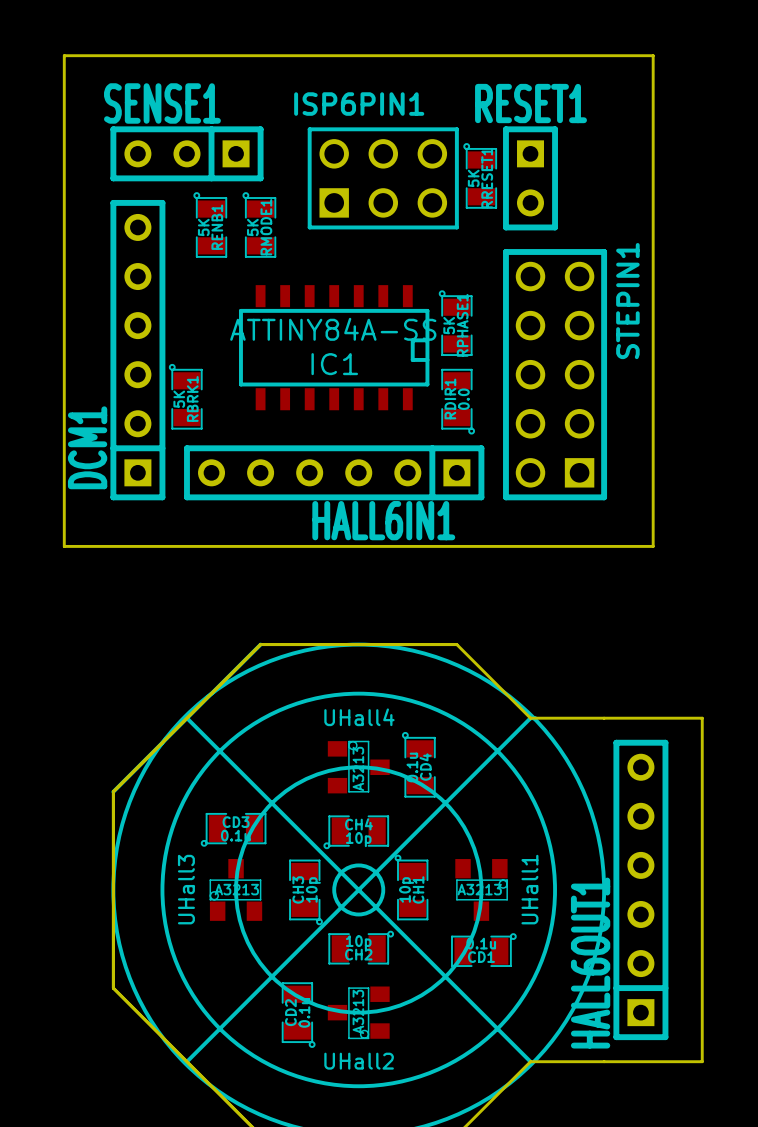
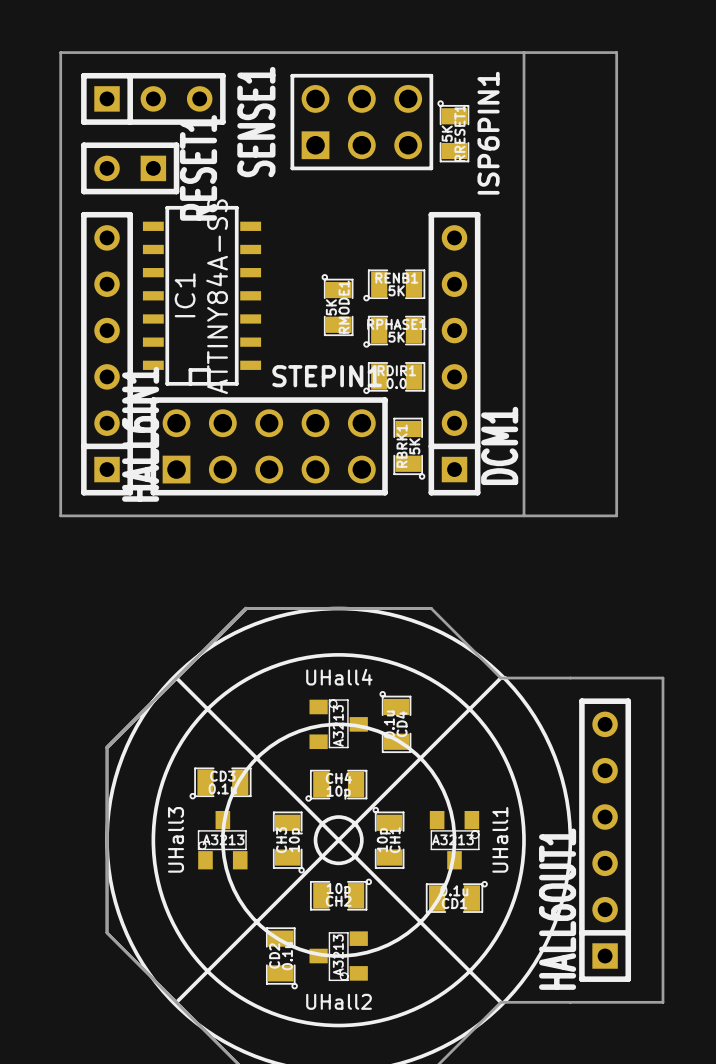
board edge: none -> (524, 52) (524, 515)
SENSE1 name position: SENSE1 (162, 103) -> SENSE1 (256, 122)
ISP6PIN1 name rotation: 0° (359, 104) -> 90° counterclockwise (488, 133)
ISP6PIN1 name position: ISP6PIN1 (359, 104) -> ISP6PIN1 (488, 133)
SENSE1 rotation: 0° (186, 153) -> 180° (153, 98)
RRESET1 position: (480, 175) -> (453, 131)
ISP6PIN1 position: (383, 178) -> (361, 122)
RESET1 rotation: 0° (530, 178) -> 90° clockwise (130, 168)
RESET1 position: (530, 178) -> (130, 168)
RENB1 rotation: 0° (210, 225) -> 90° counterclockwise (394, 285)
RENB1 position: (210, 225) -> (394, 285)
RMODE1 position: (259, 225) -> (337, 305)
RPHASE1 rotation: 0° (455, 323) -> 90° counterclockwise (394, 331)
RPHASE1 position: (455, 323) -> (394, 331)
IC1 rotation: 0° (334, 347) -> 90° clockwise (202, 295)
IC1 position: (334, 347) -> (202, 295)
DCM1 position: (137, 350) -> (454, 353)
STEPIN1 rotation: 0° (555, 374) -> 90° clockwise (269, 446)
STEPIN1 position: (555, 374) -> (269, 446)
RBRK1 rotation: 0° (185, 396) -> 180° (409, 448)
RBRK1 position: (185, 396) -> (409, 448)
RDIR1 rotation: 0° (458, 401) -> 90° clockwise (394, 378)
RDIR1 position: (458, 401) -> (394, 378)
DCM1 name position: DCM1 (87, 447) -> DCM1 (499, 445)
HALL6IN1 rotation: 0° (334, 472) -> 90° clockwise (107, 353)
HALL6IN1 position: (334, 472) -> (107, 353)

